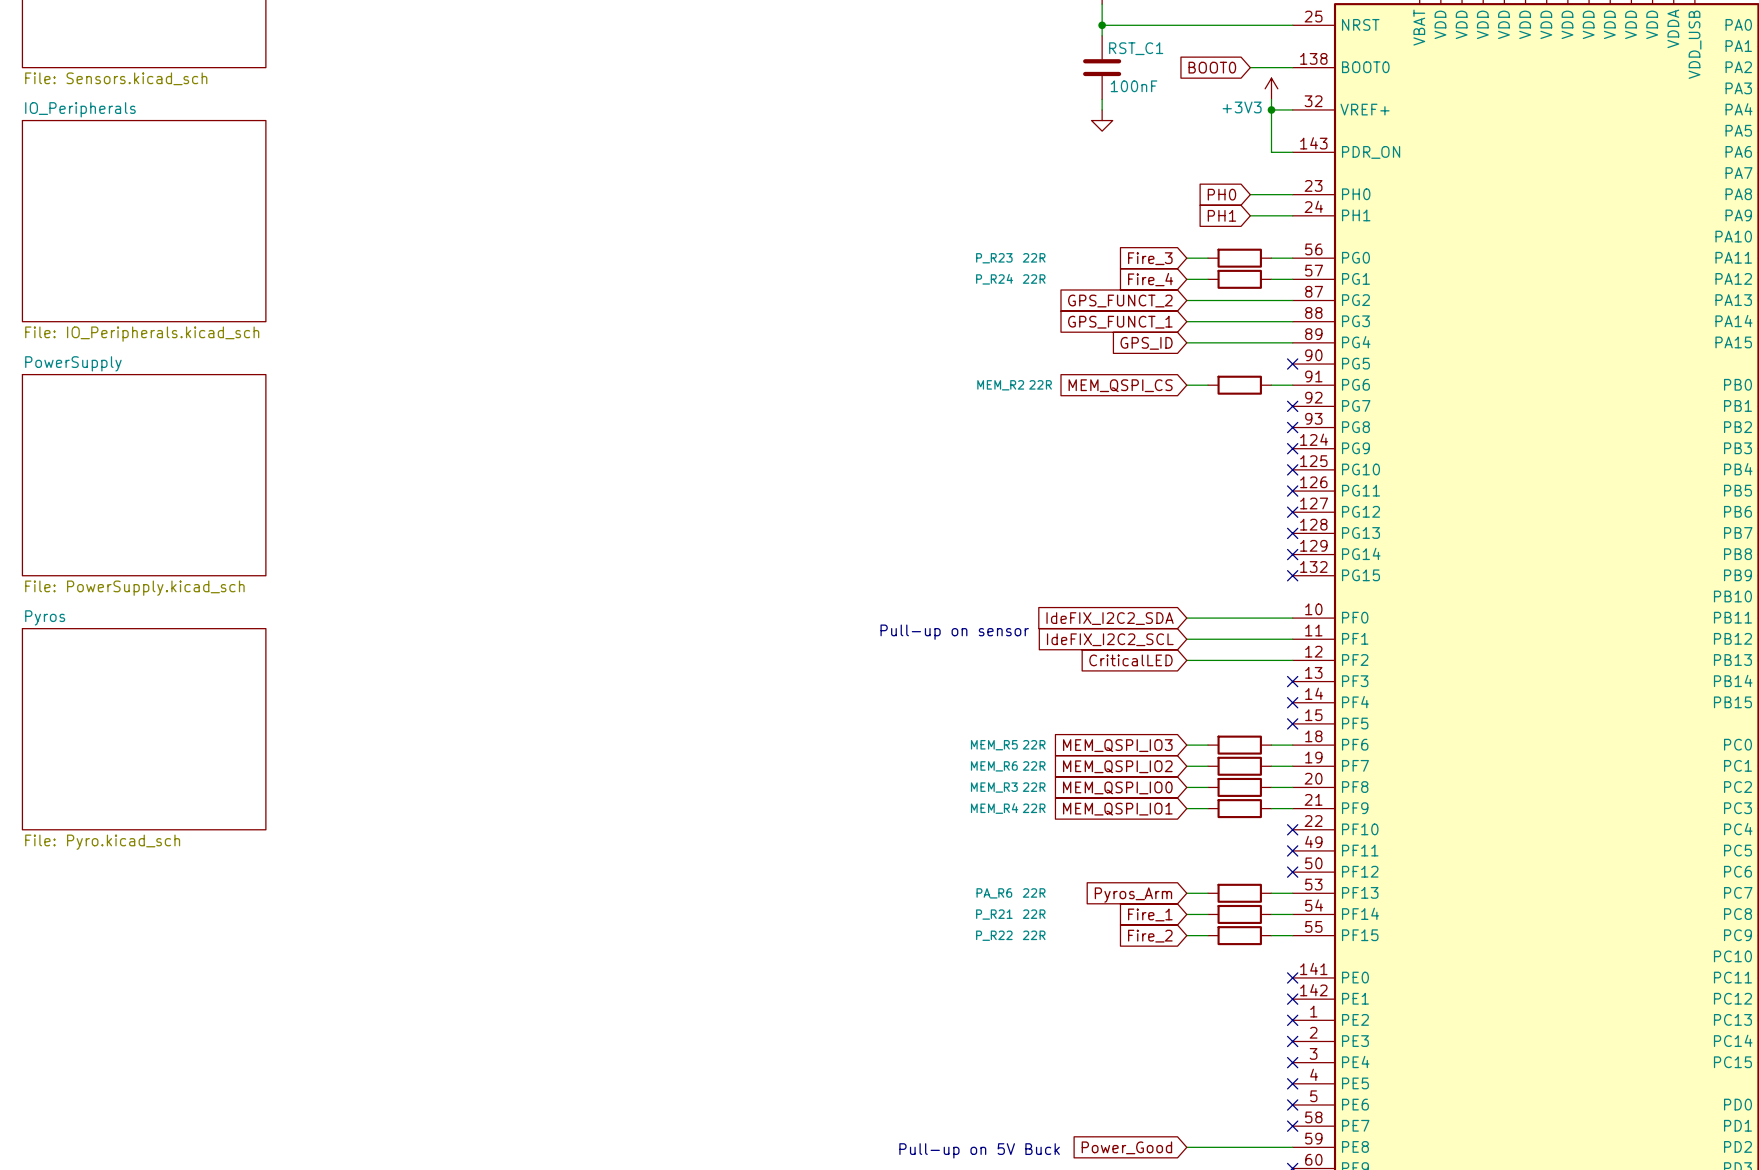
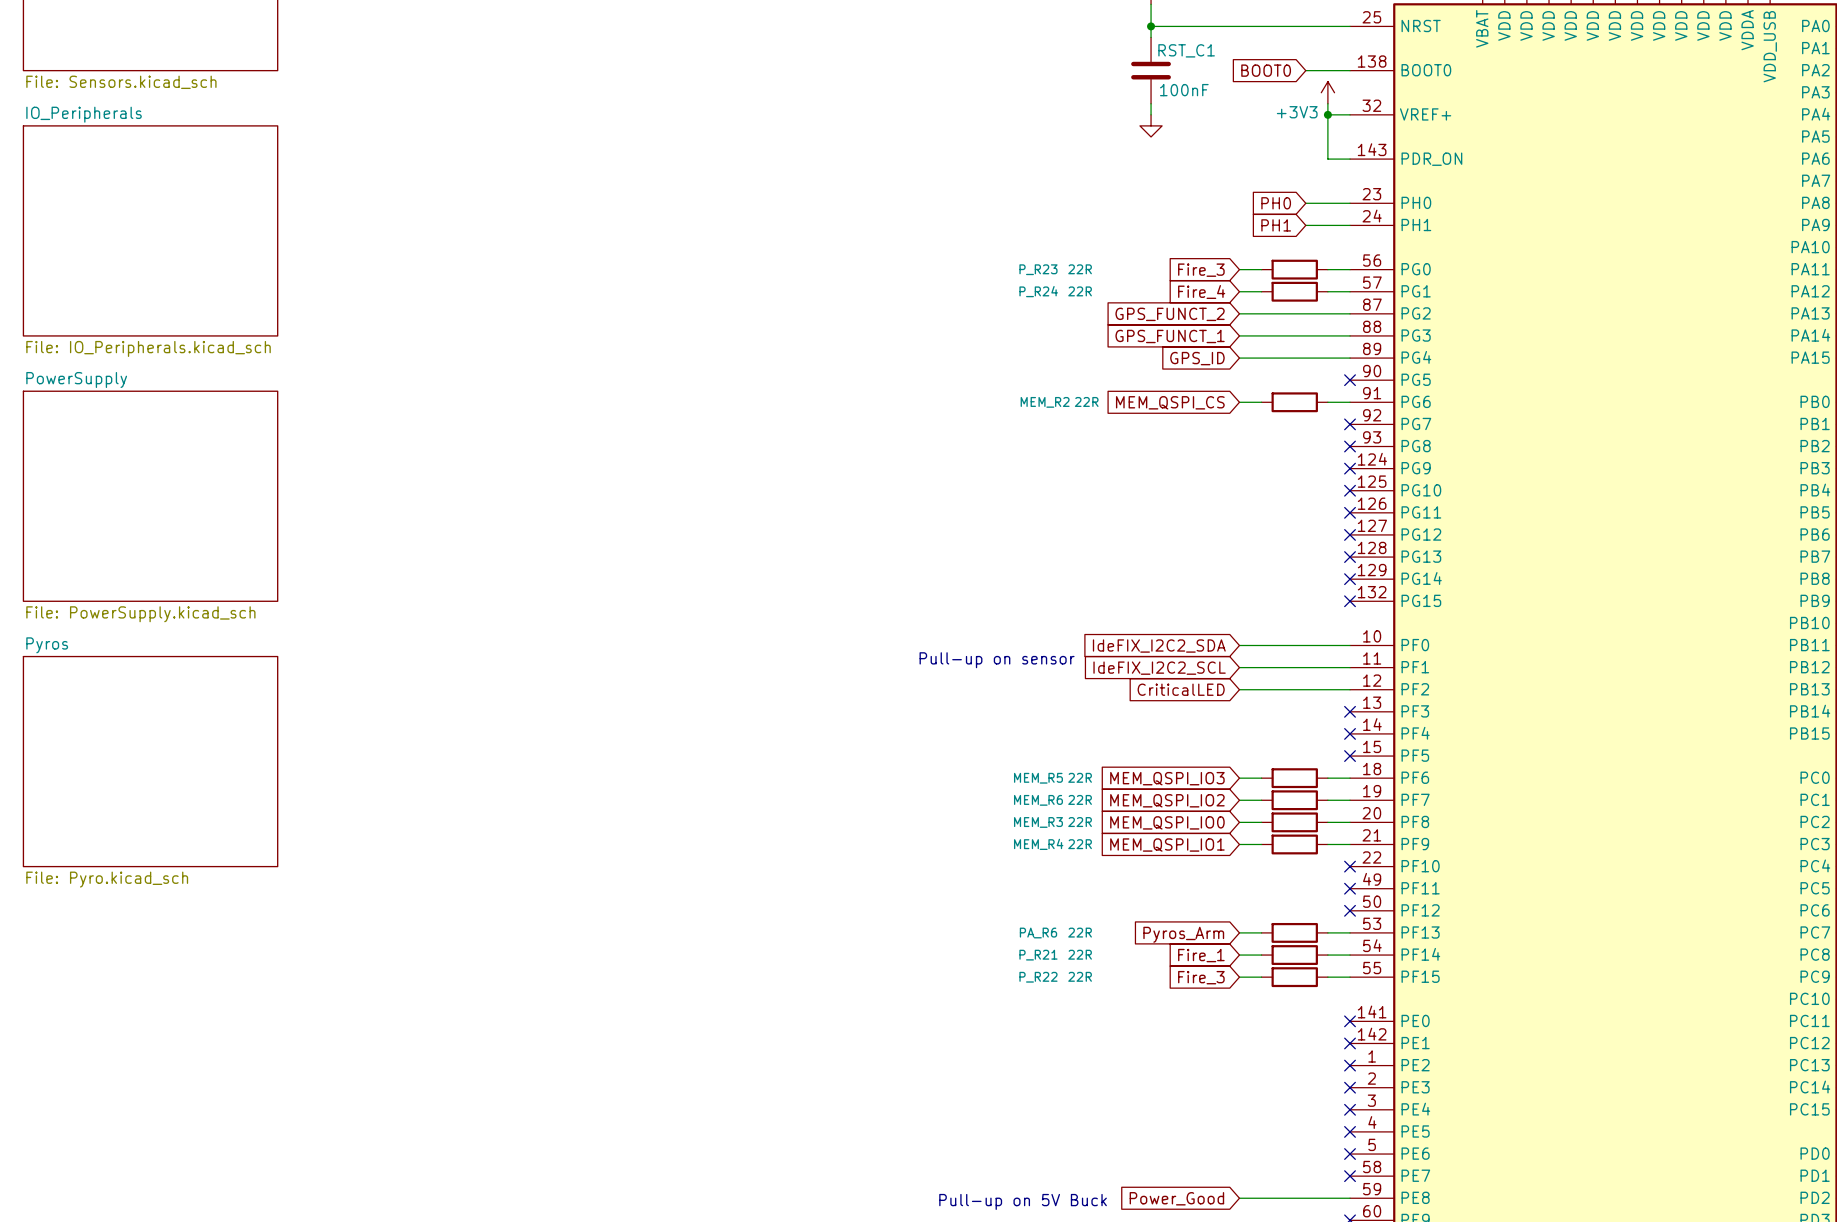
global label: Fire_2 (1150, 936) -> Fire_3 (1201, 977)

